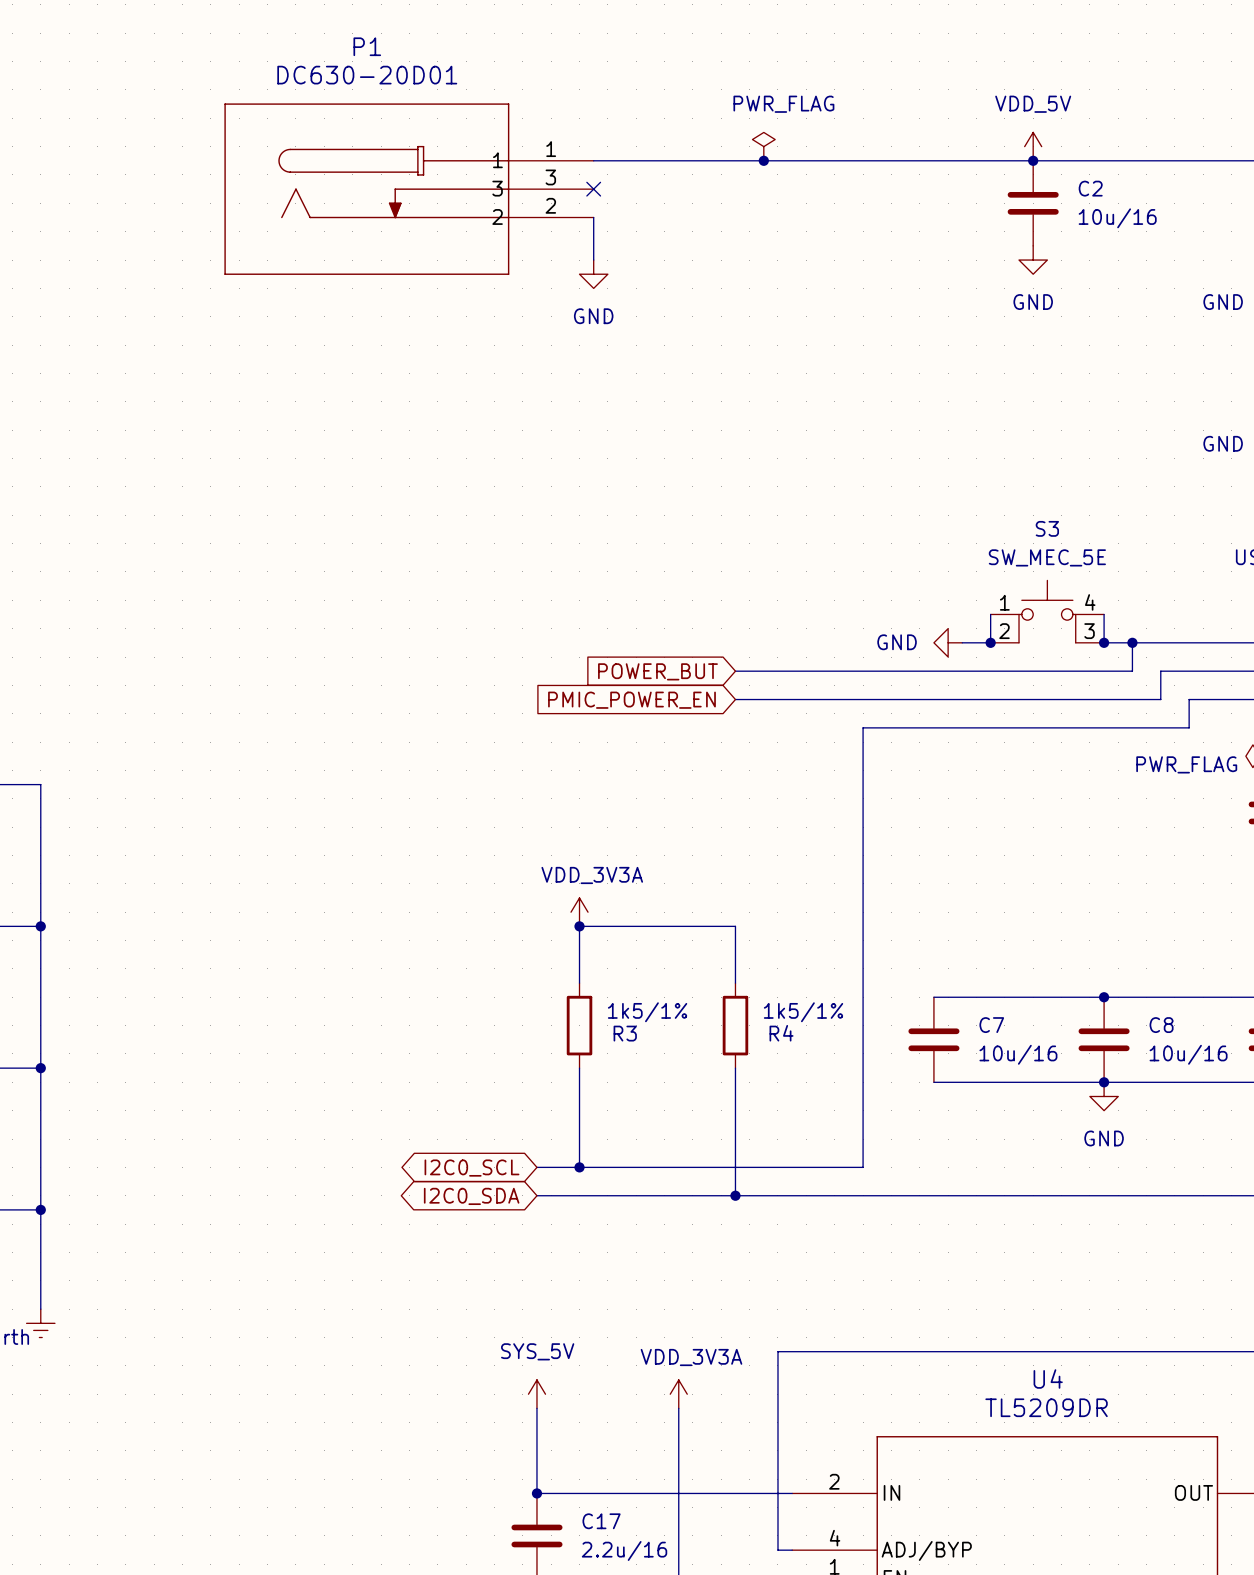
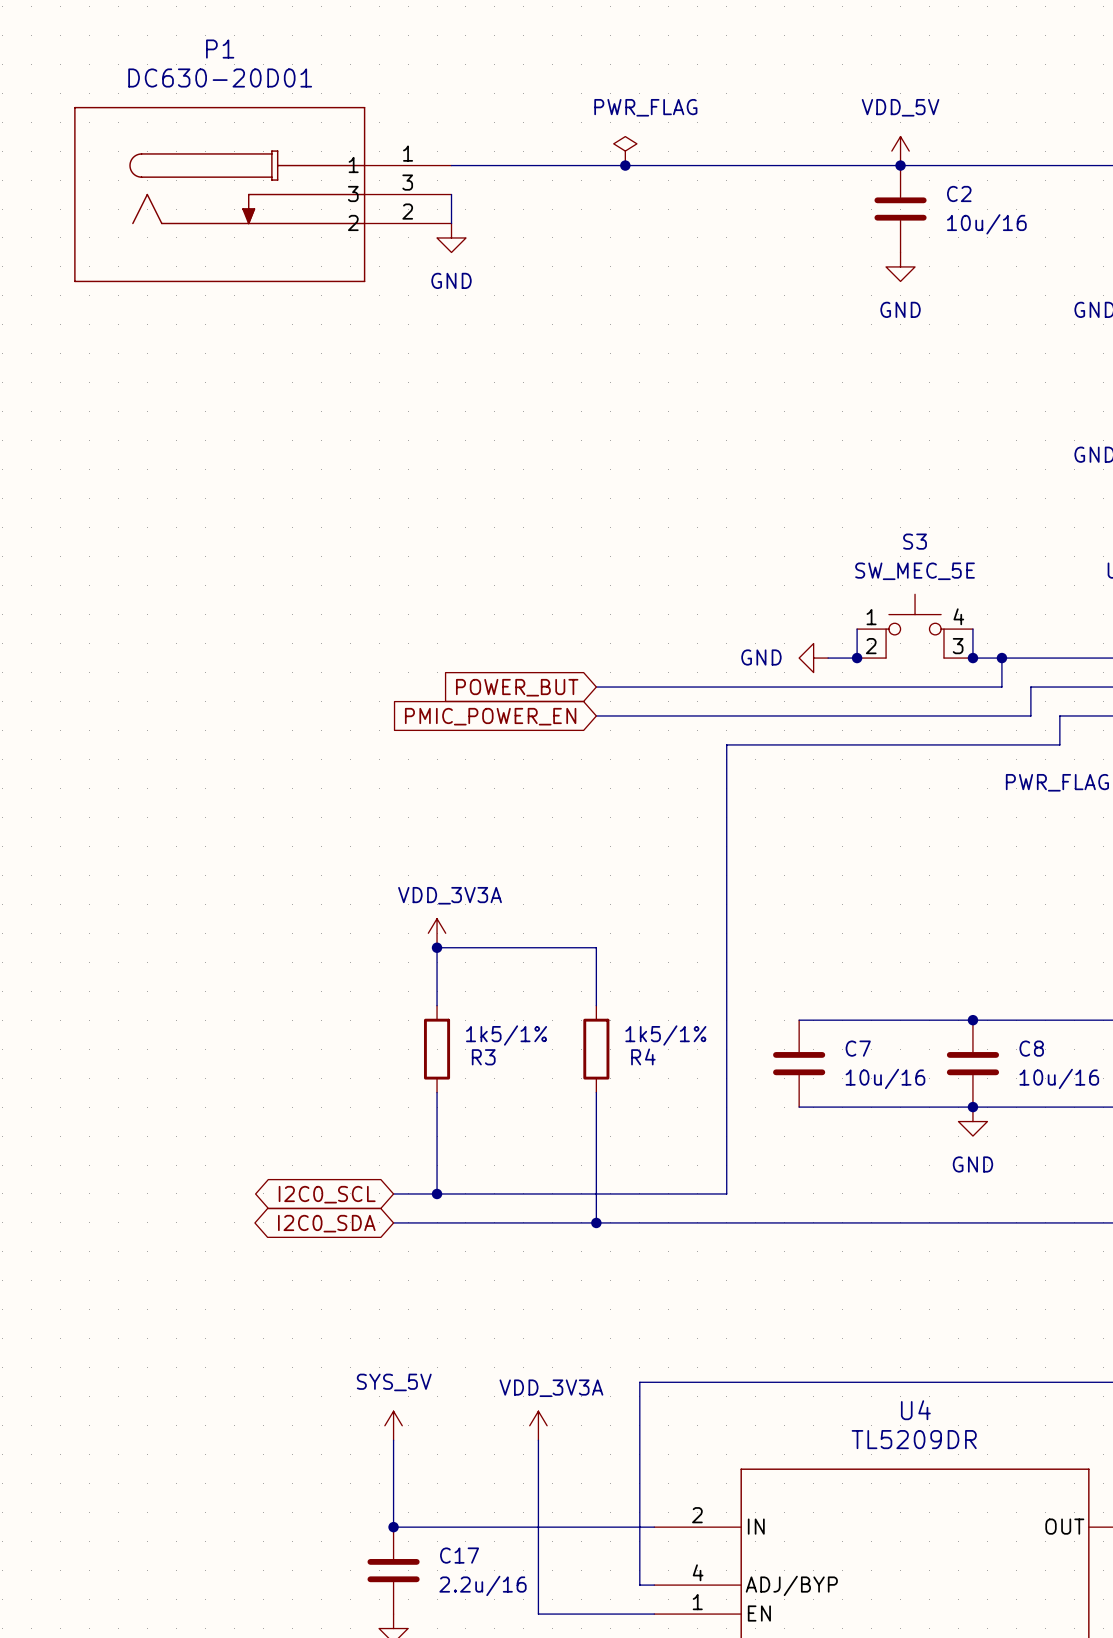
no-connect mark: (593, 189) -> none
wire: (593, 217) (593, 260) -> (451, 223) (451, 194)
power symbol position: GND (593, 274) -> GND (451, 237)

